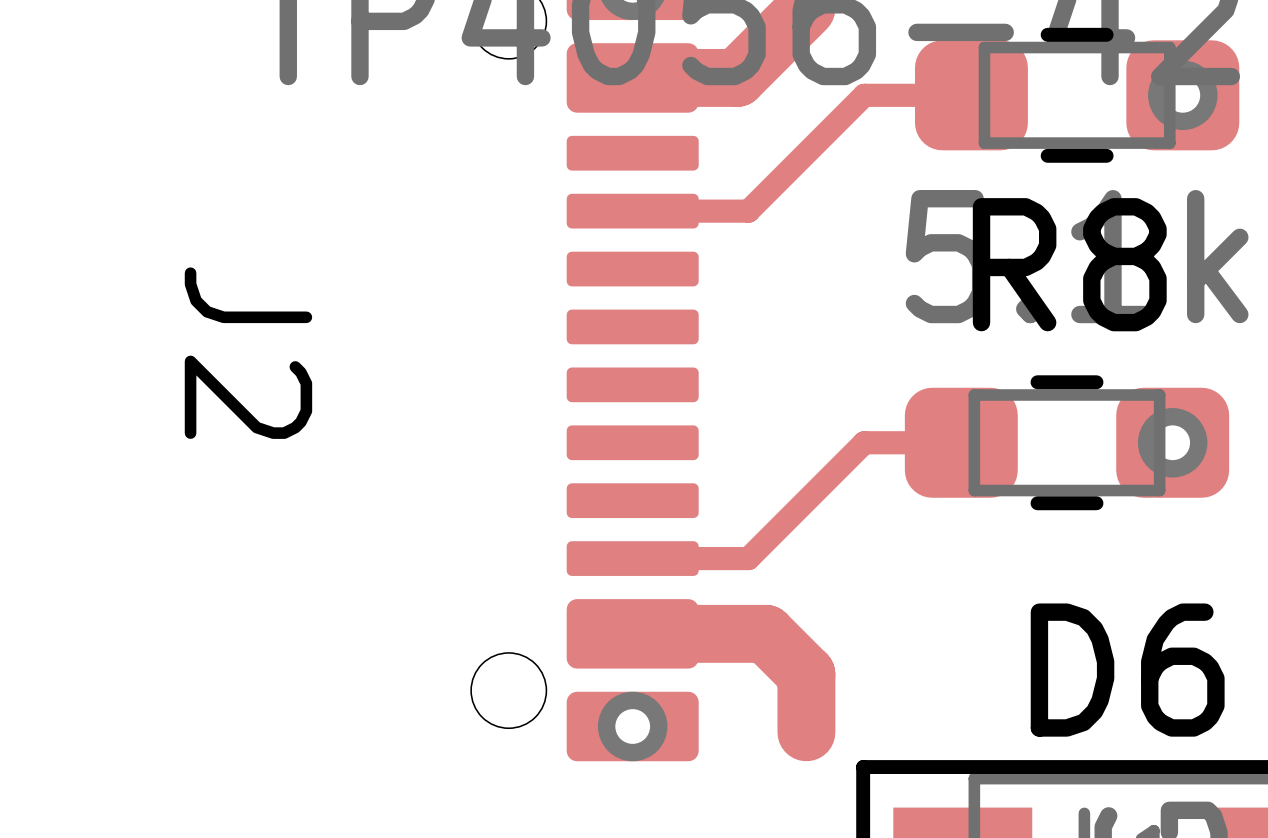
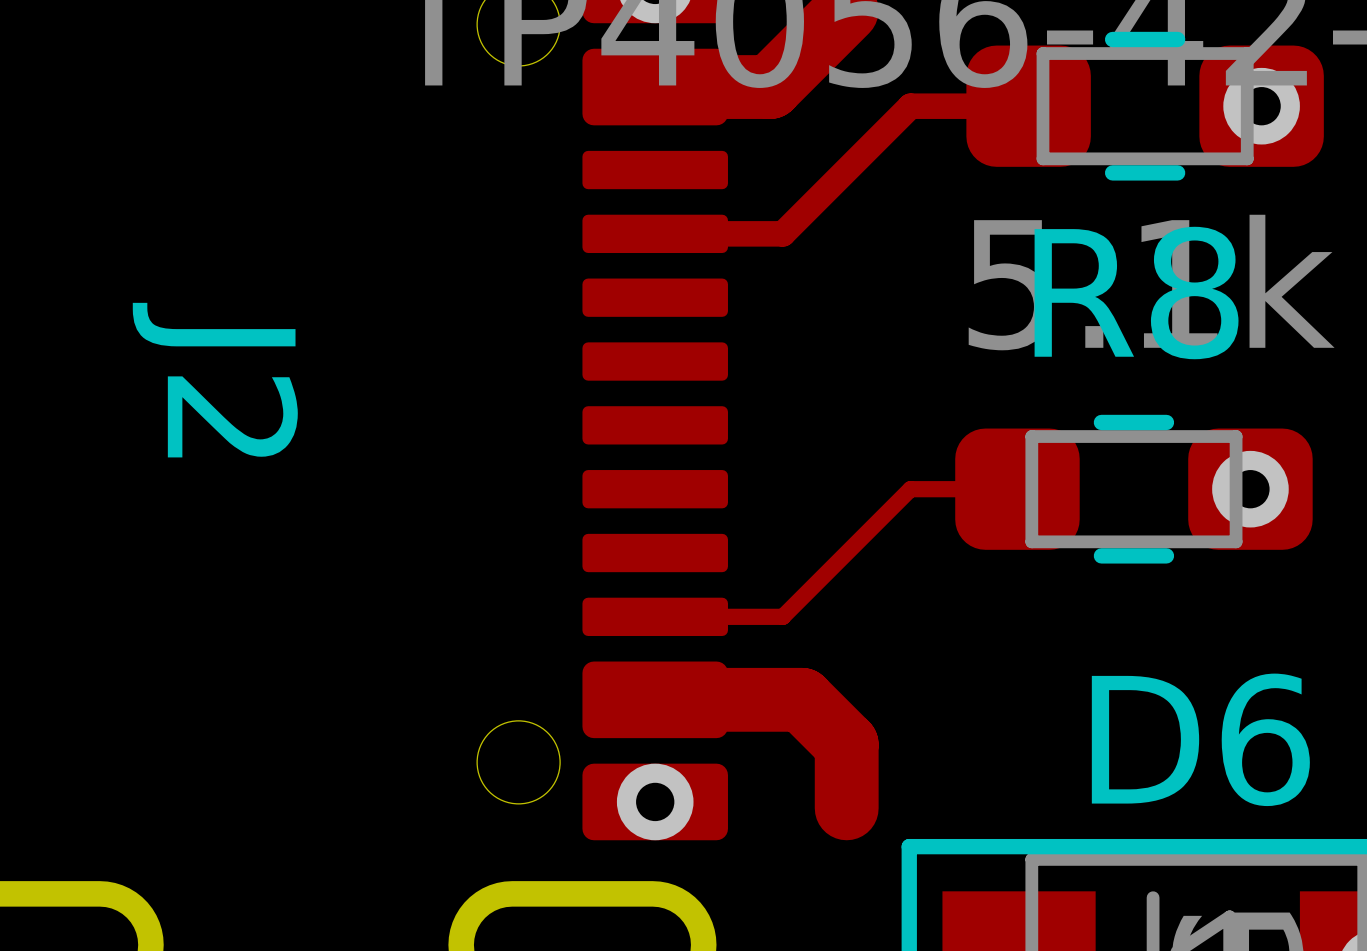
top track width: thick (961, 442) (864, 442) (748, 558) (632, 558) -> thin (1017, 489) (910, 489) (782, 616) (655, 616)

